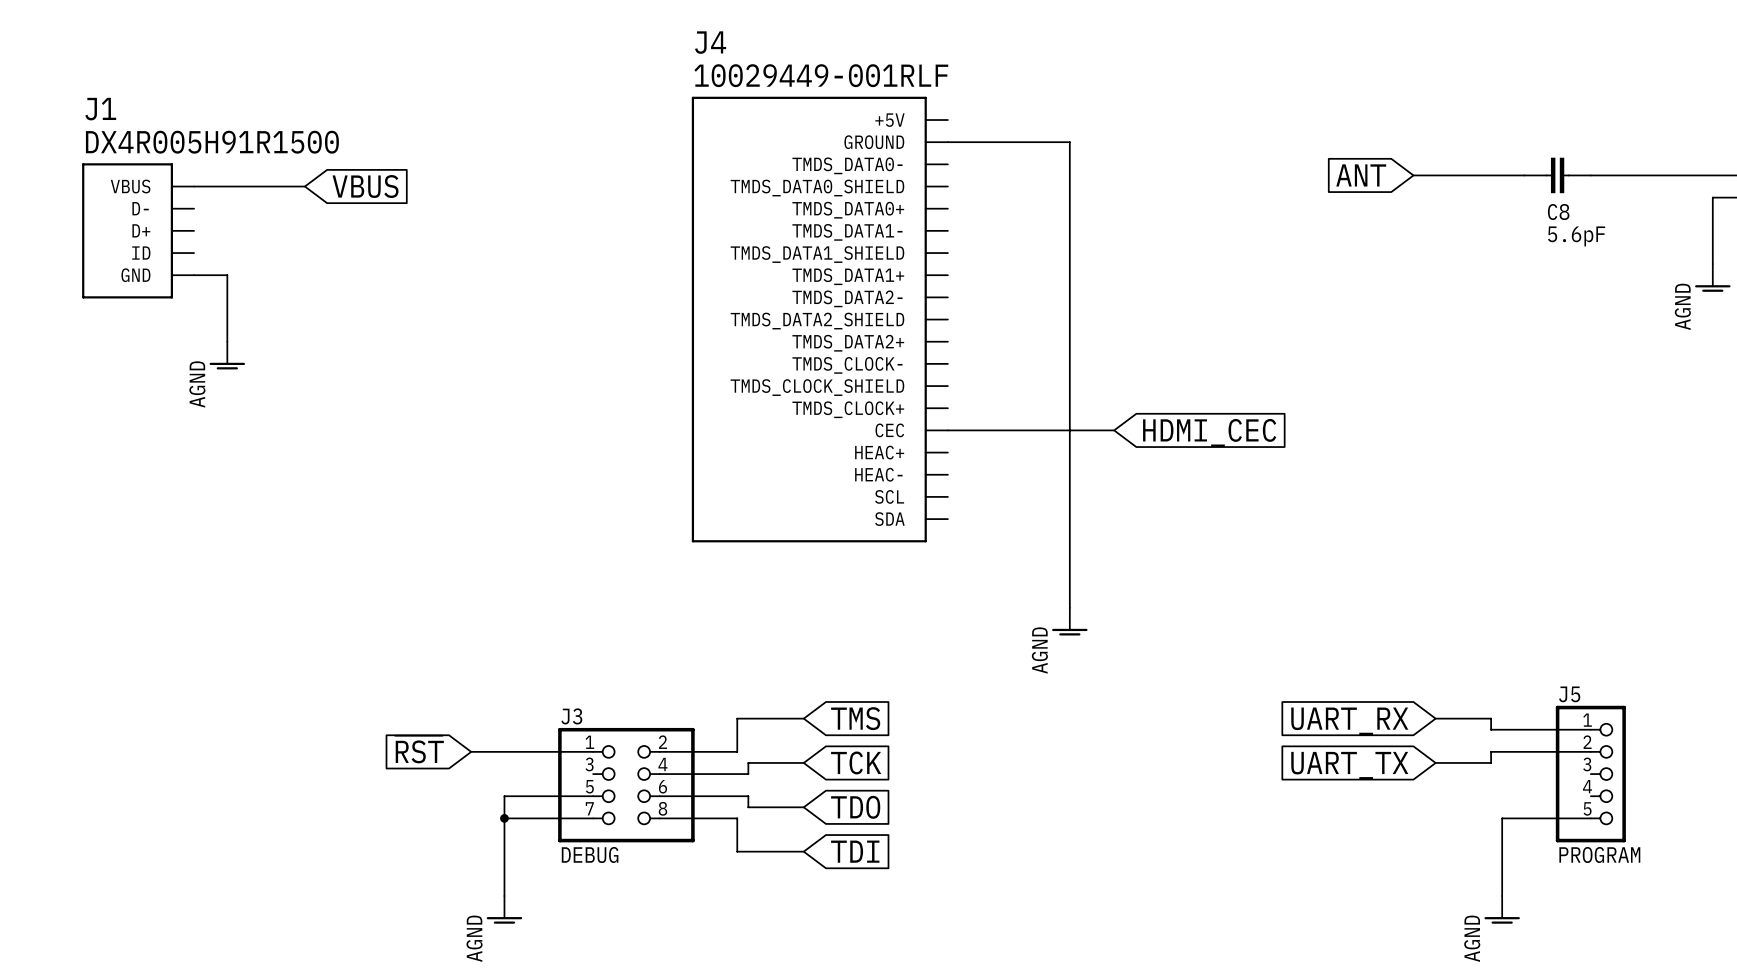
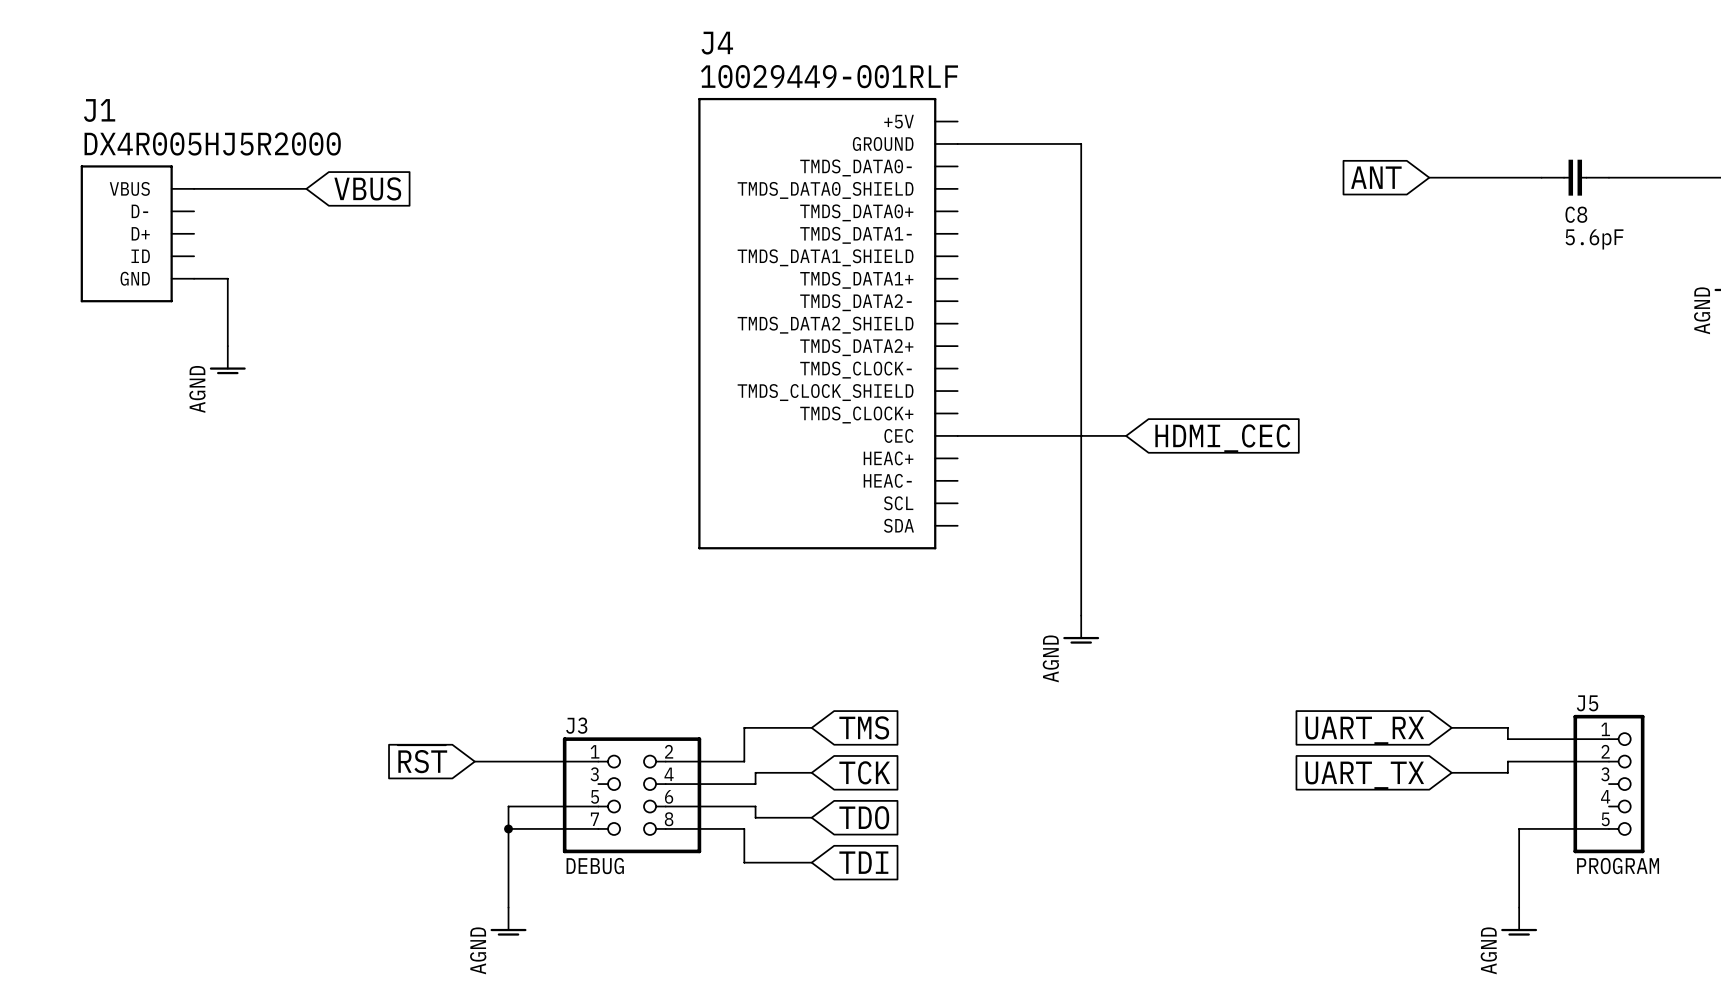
J1 value: DX4R005H91R1500 (212, 142) -> DX4R005HJ5R2000 (212, 143)

